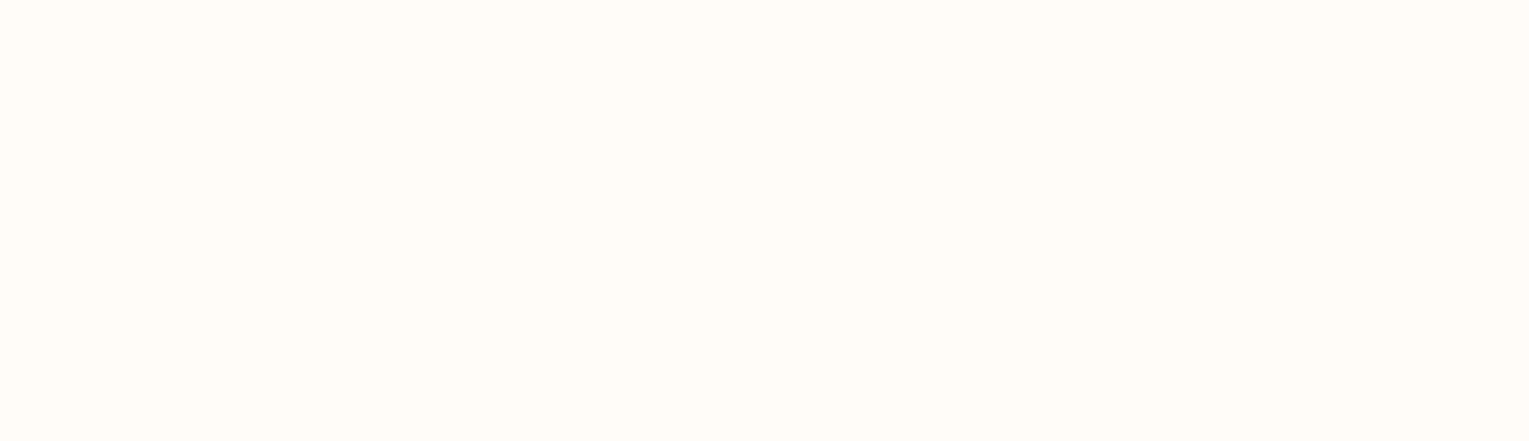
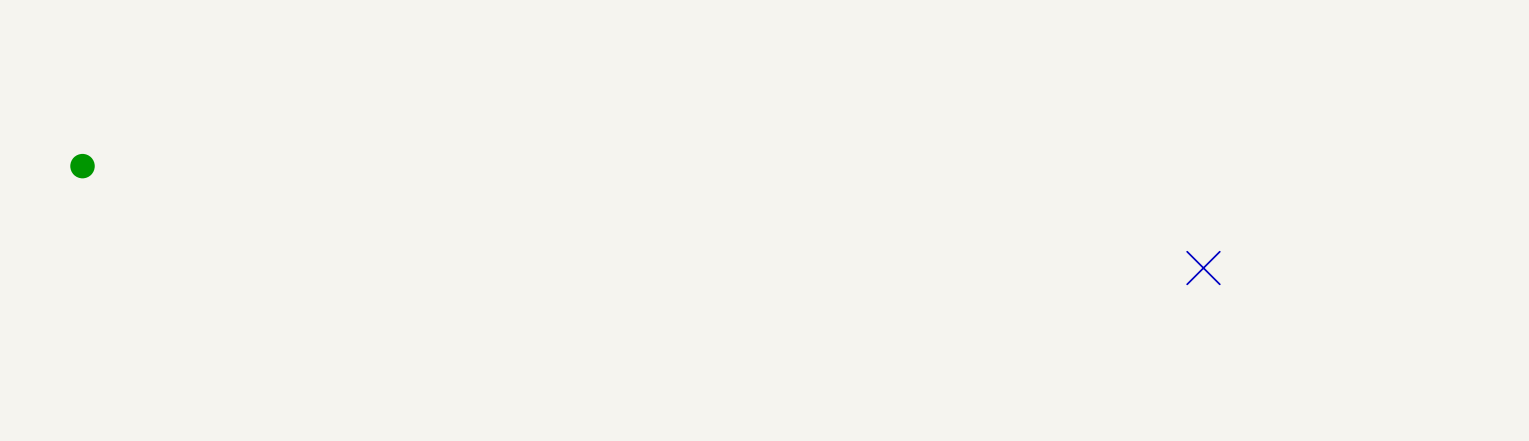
junction: none -> (82, 166)
no-connect mark: none -> (1203, 268)

